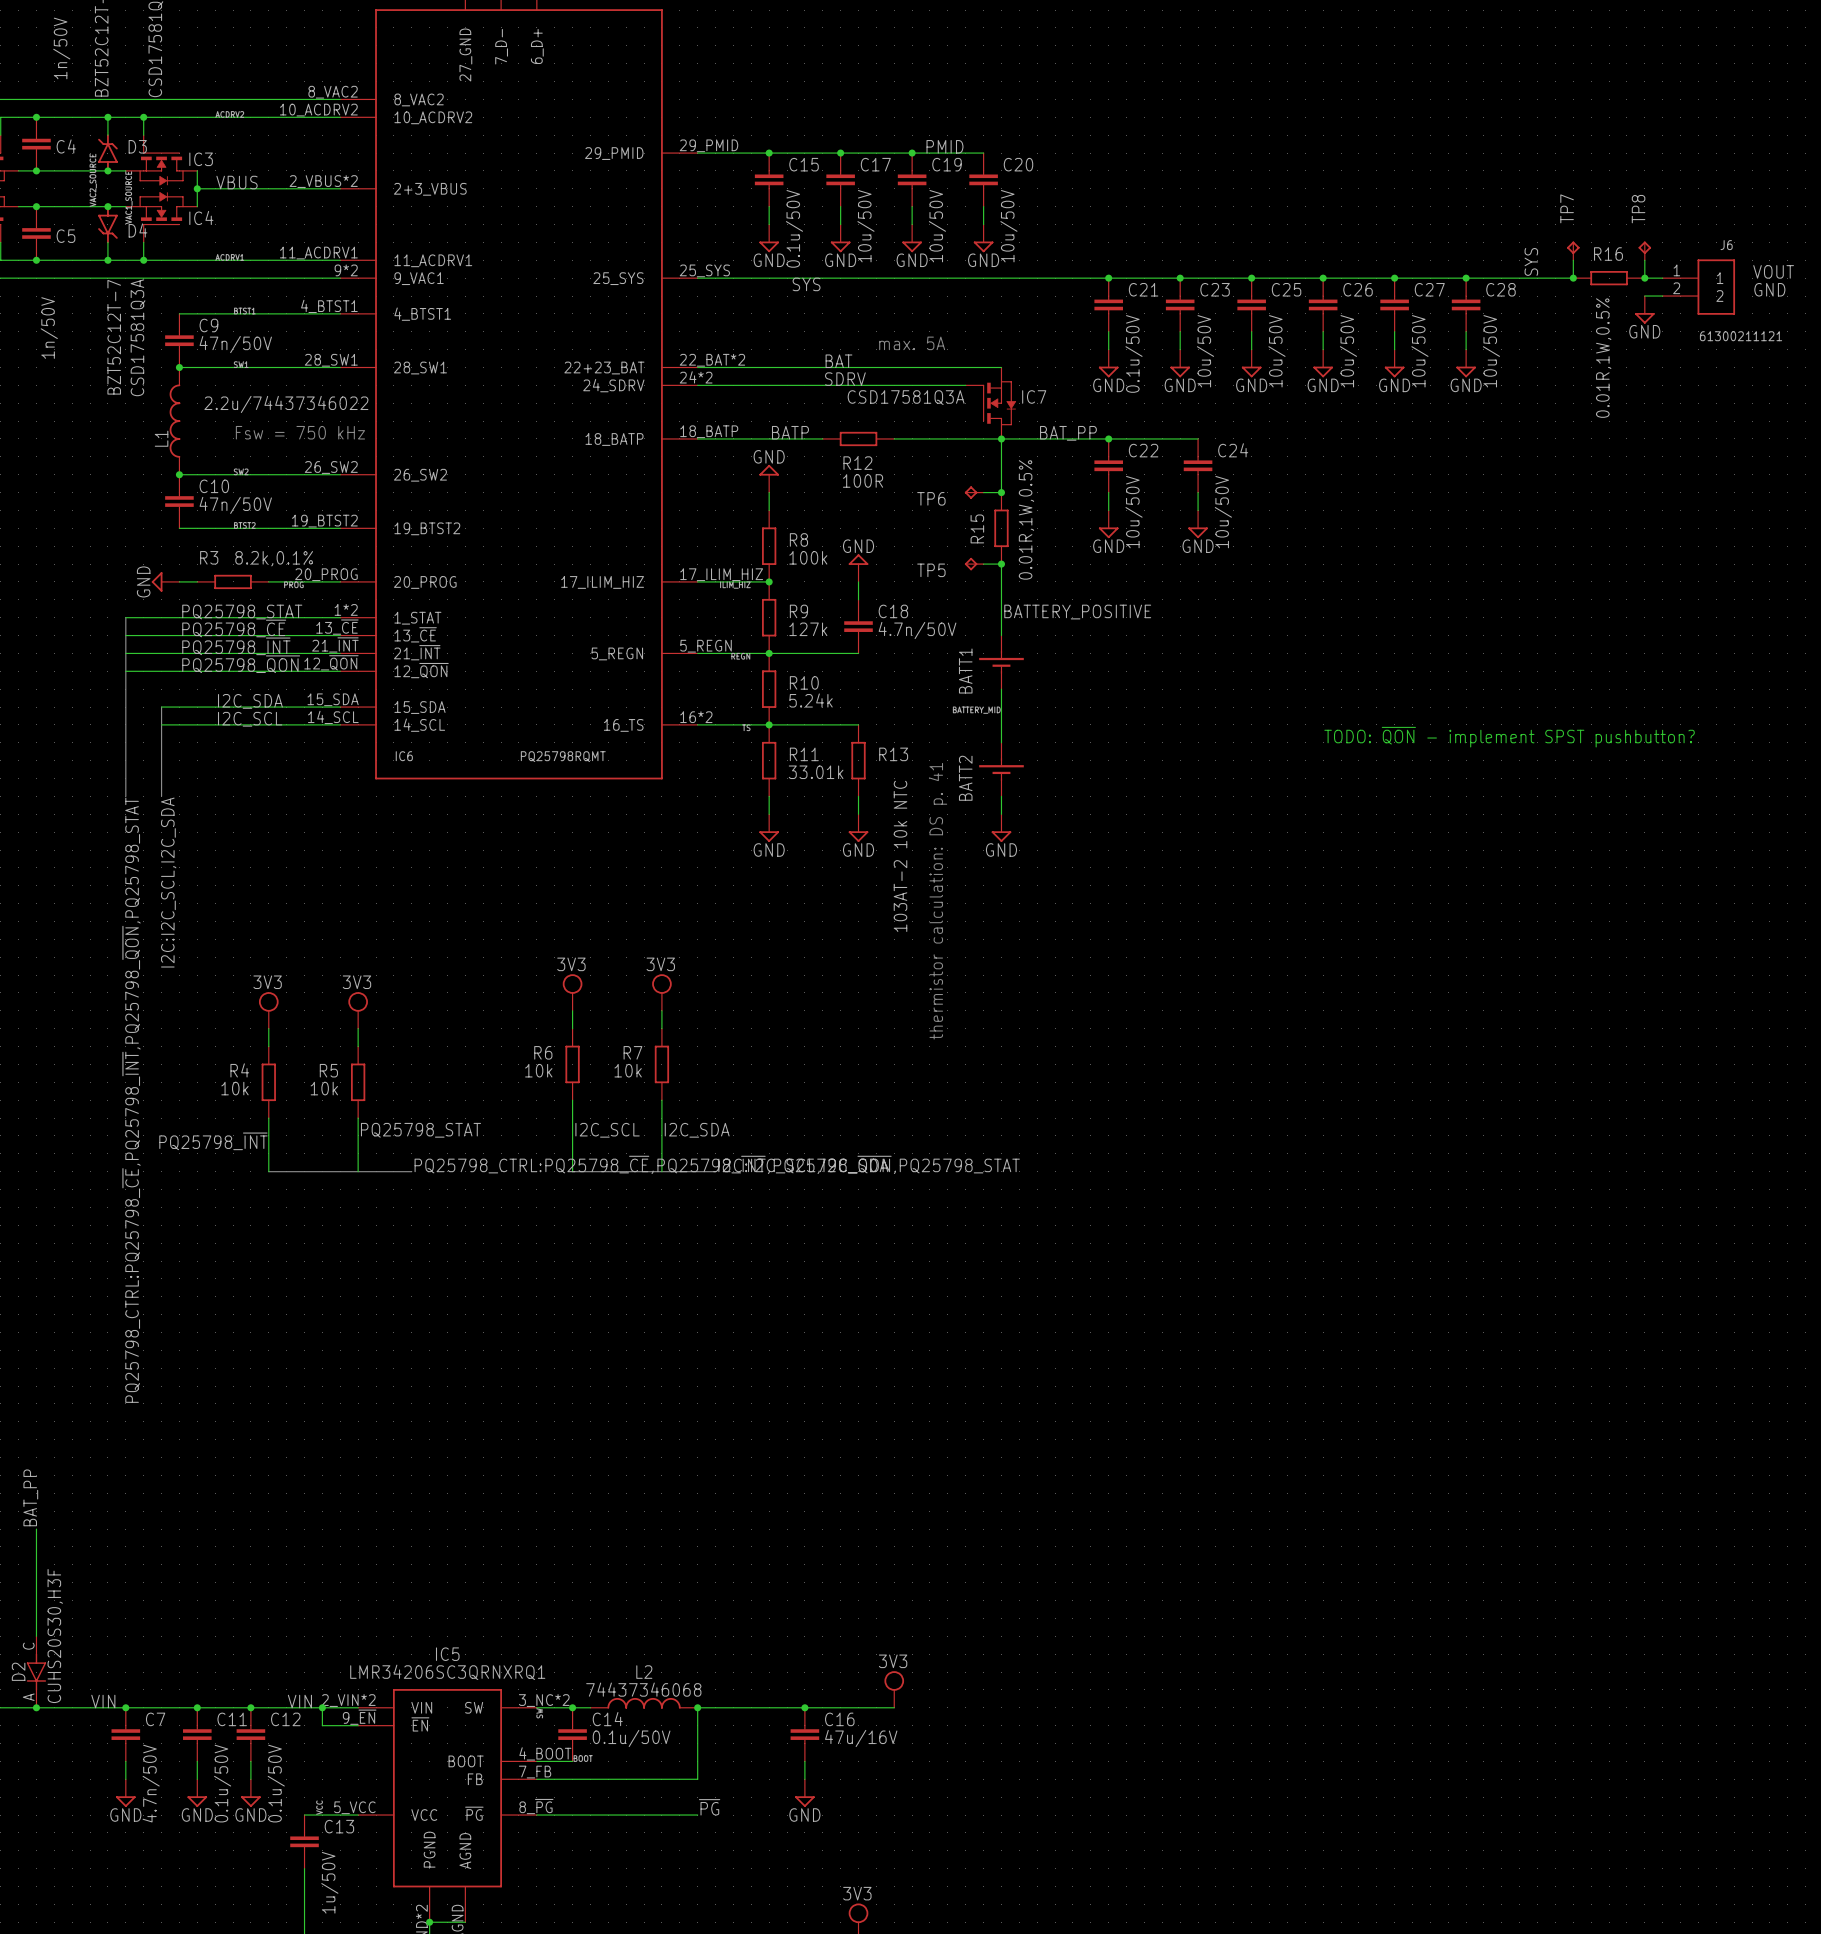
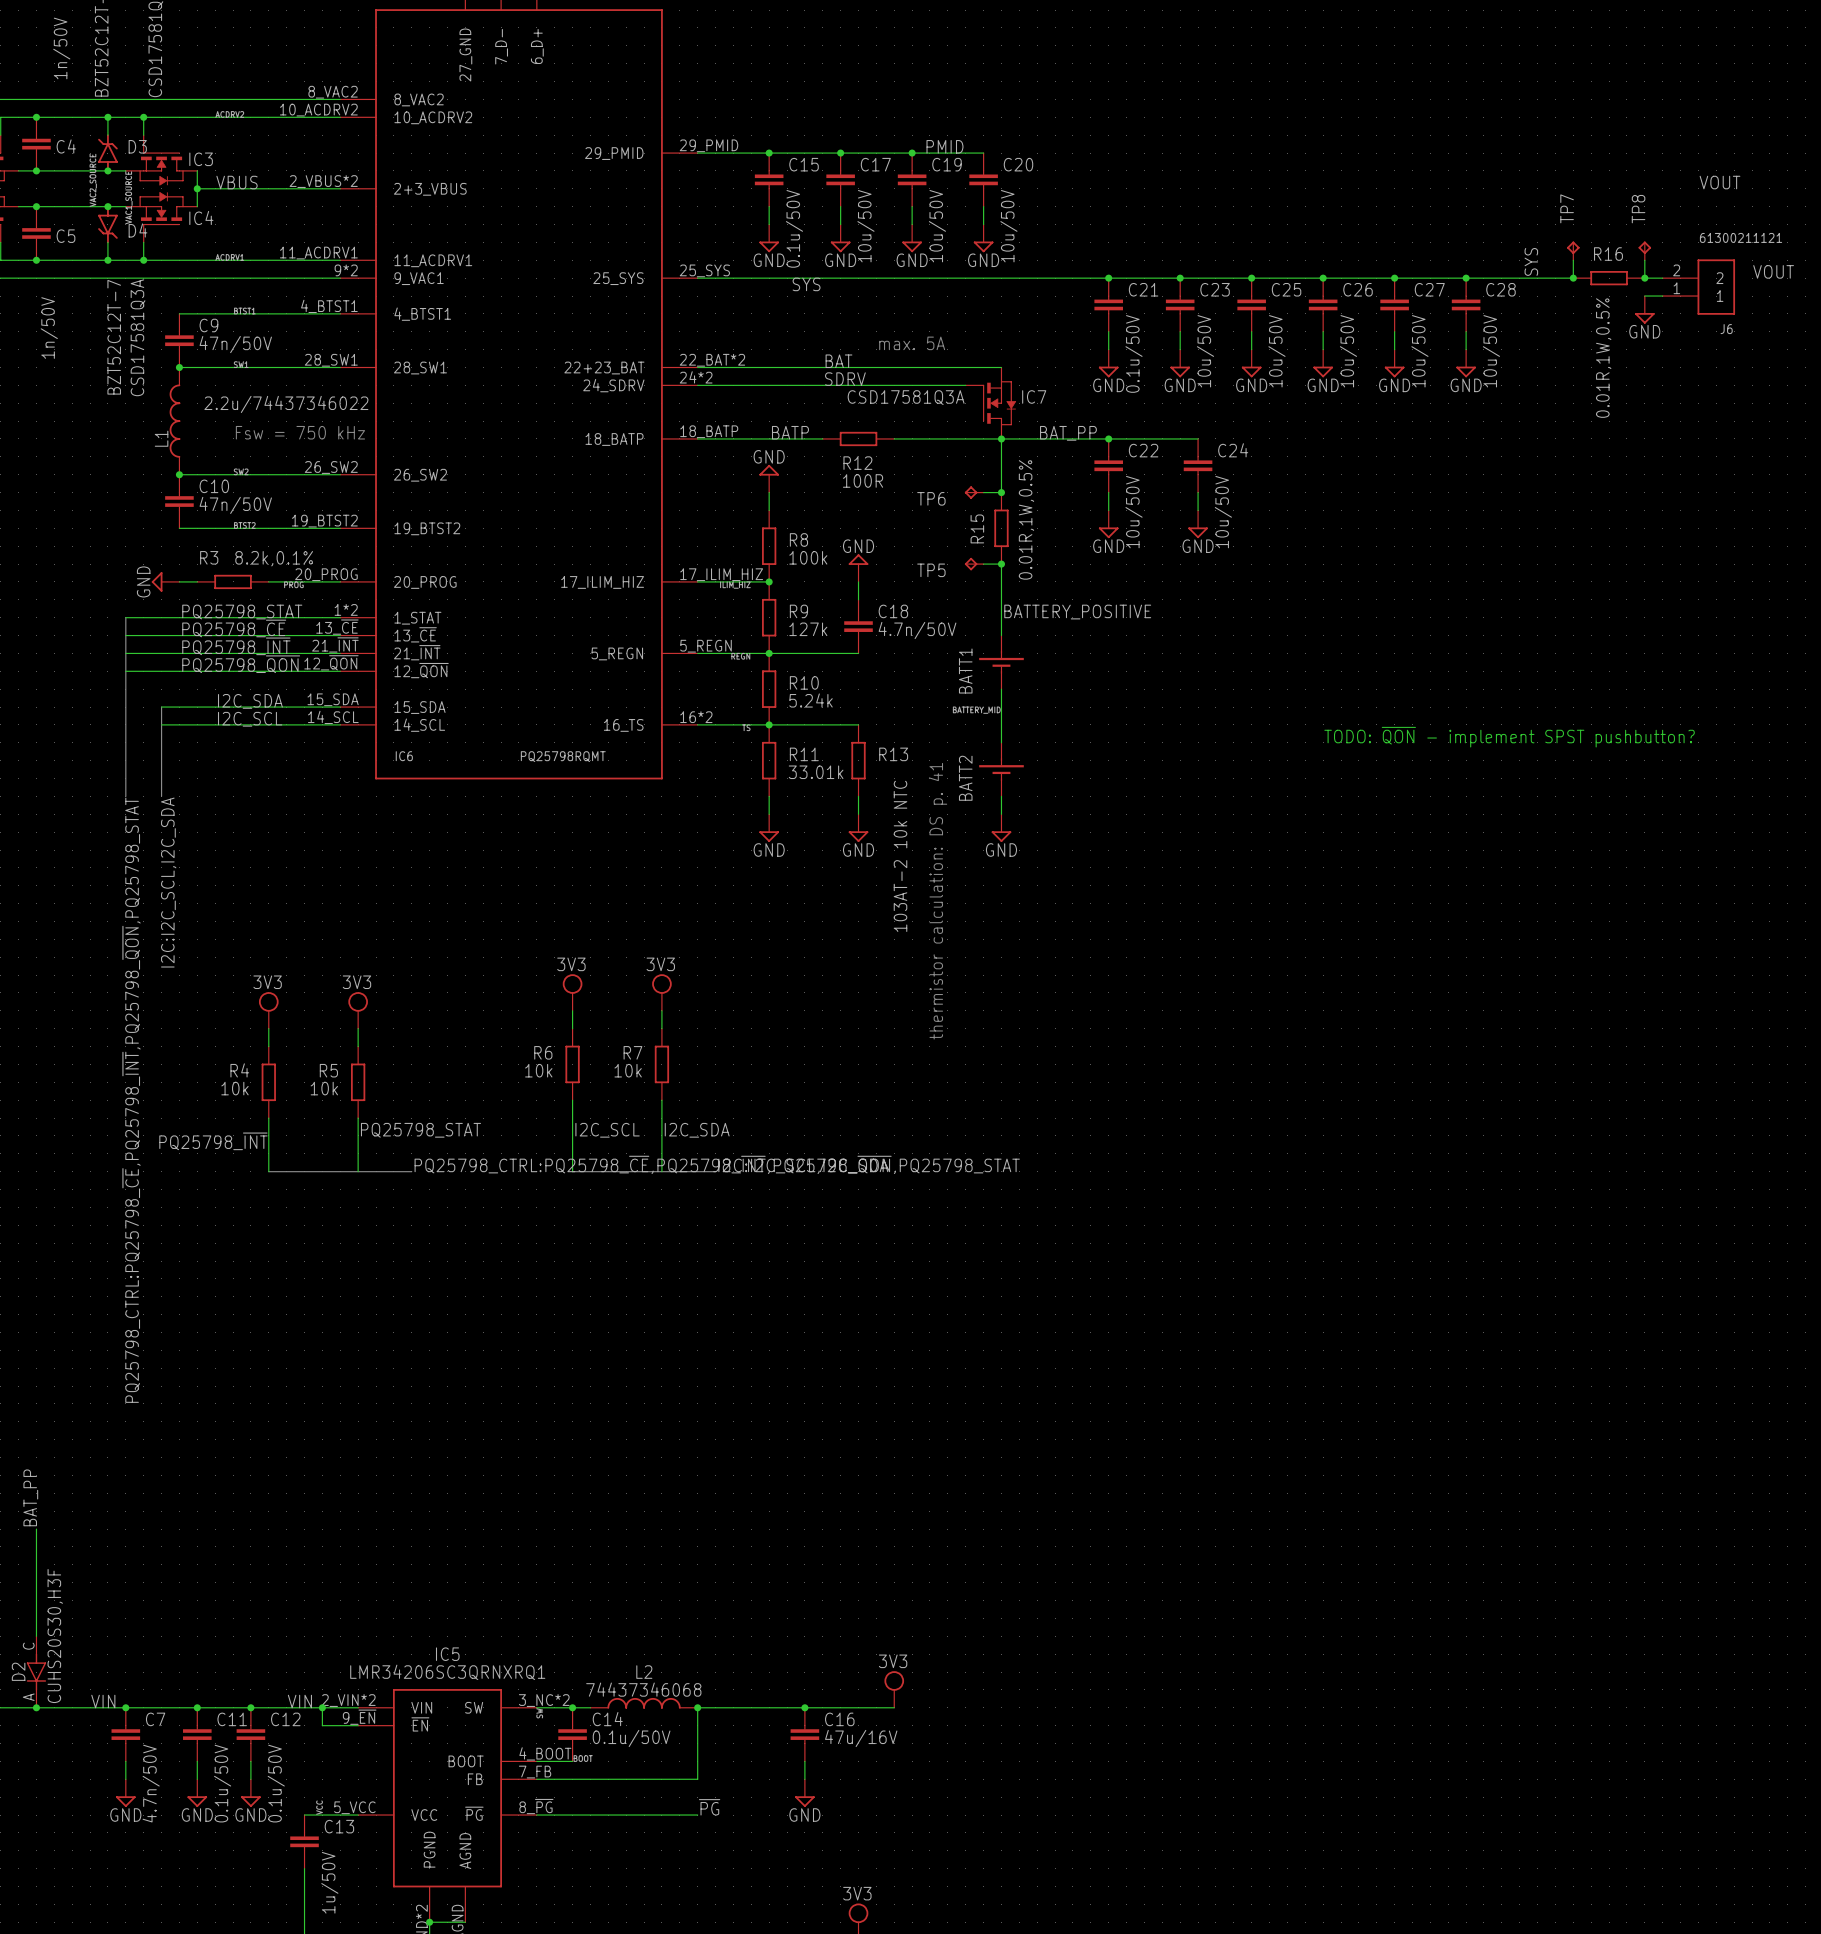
label: none -> VOUT (1719, 182)
J6 flip: as is (1716, 287) -> up-down (1716, 287)
label: GND (1769, 289) -> none

